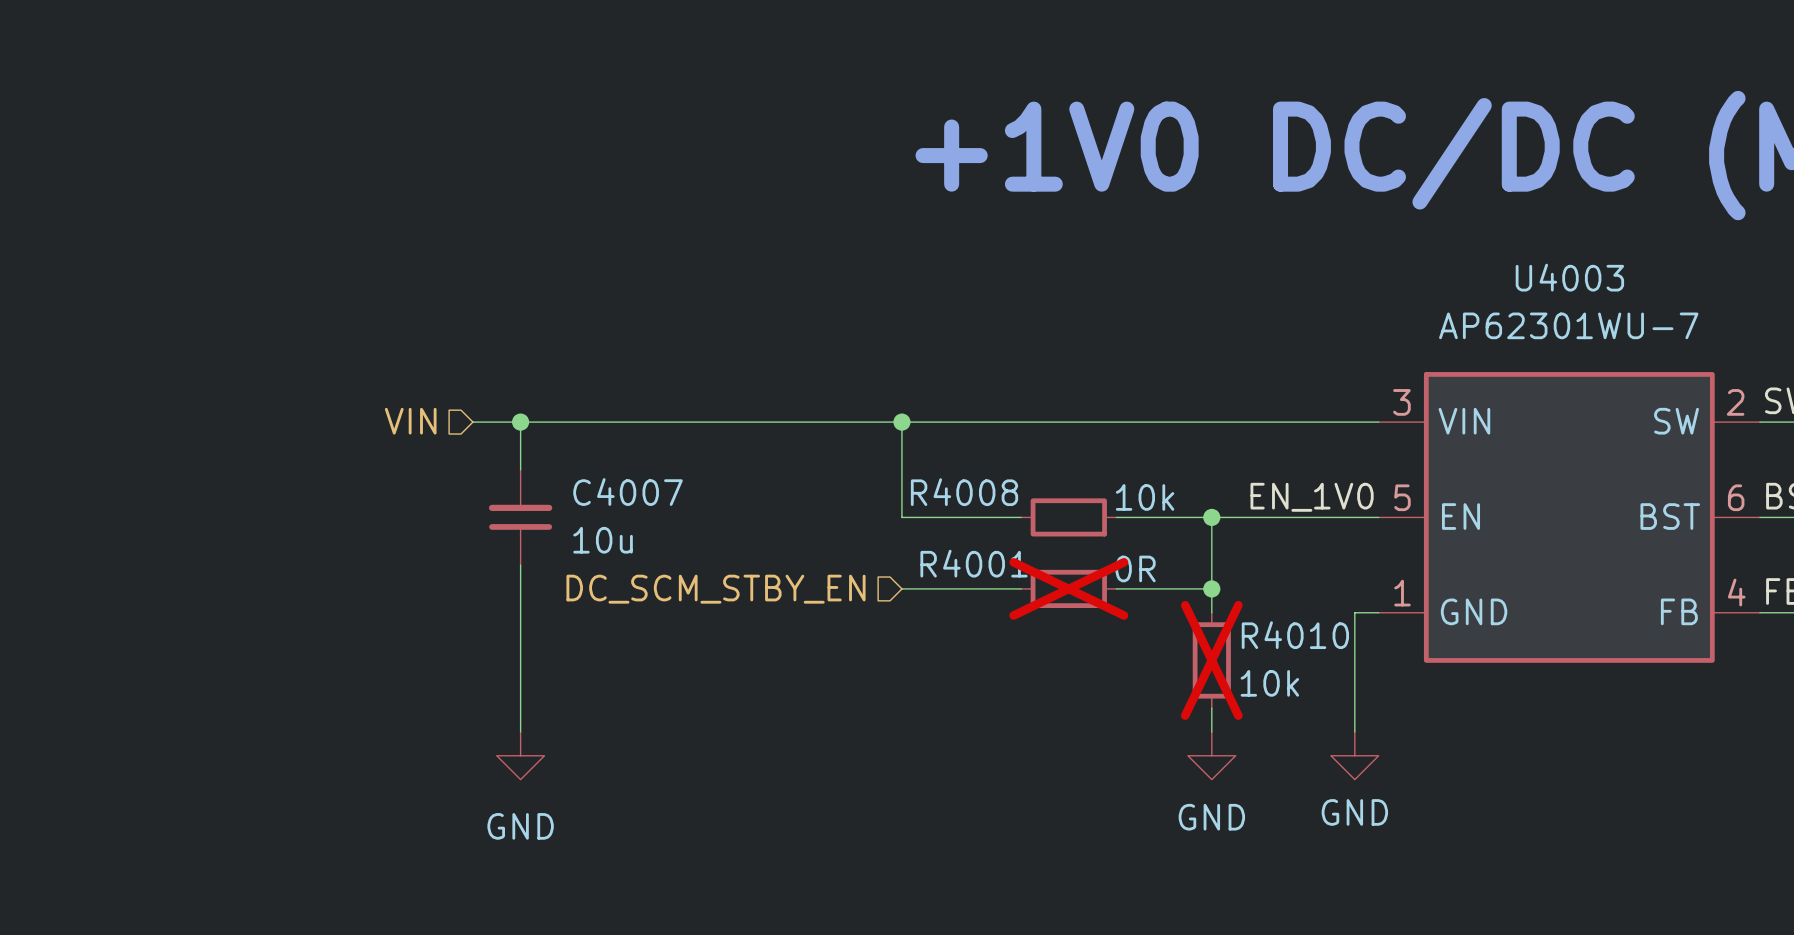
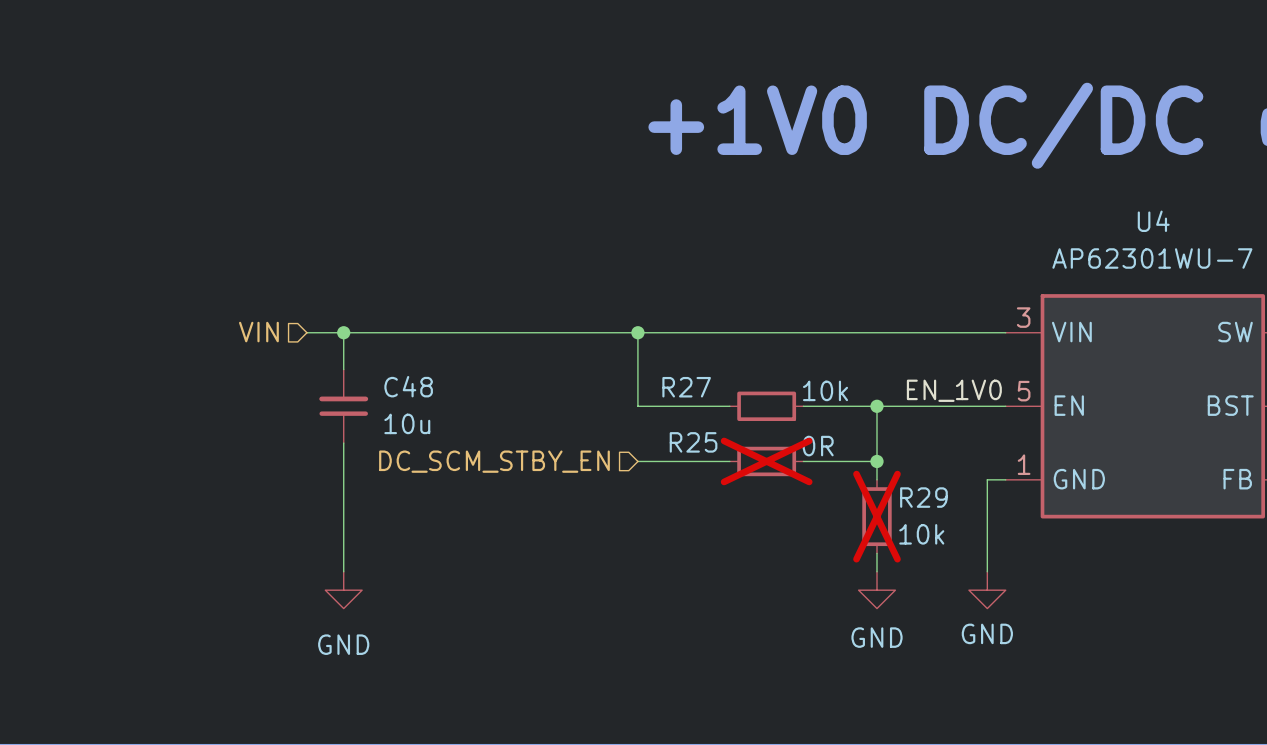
U4003 name: U4003 (1569, 277) -> U4 (1153, 221)
C4007 name: C4007 (628, 492) -> C48 (408, 386)
R4008 name: R4008 (964, 492) -> R27 (686, 387)
R4001 name: R4001 (974, 563) -> R25 (693, 442)
R4010 name: R4010 (1295, 635) -> R29 (923, 497)

